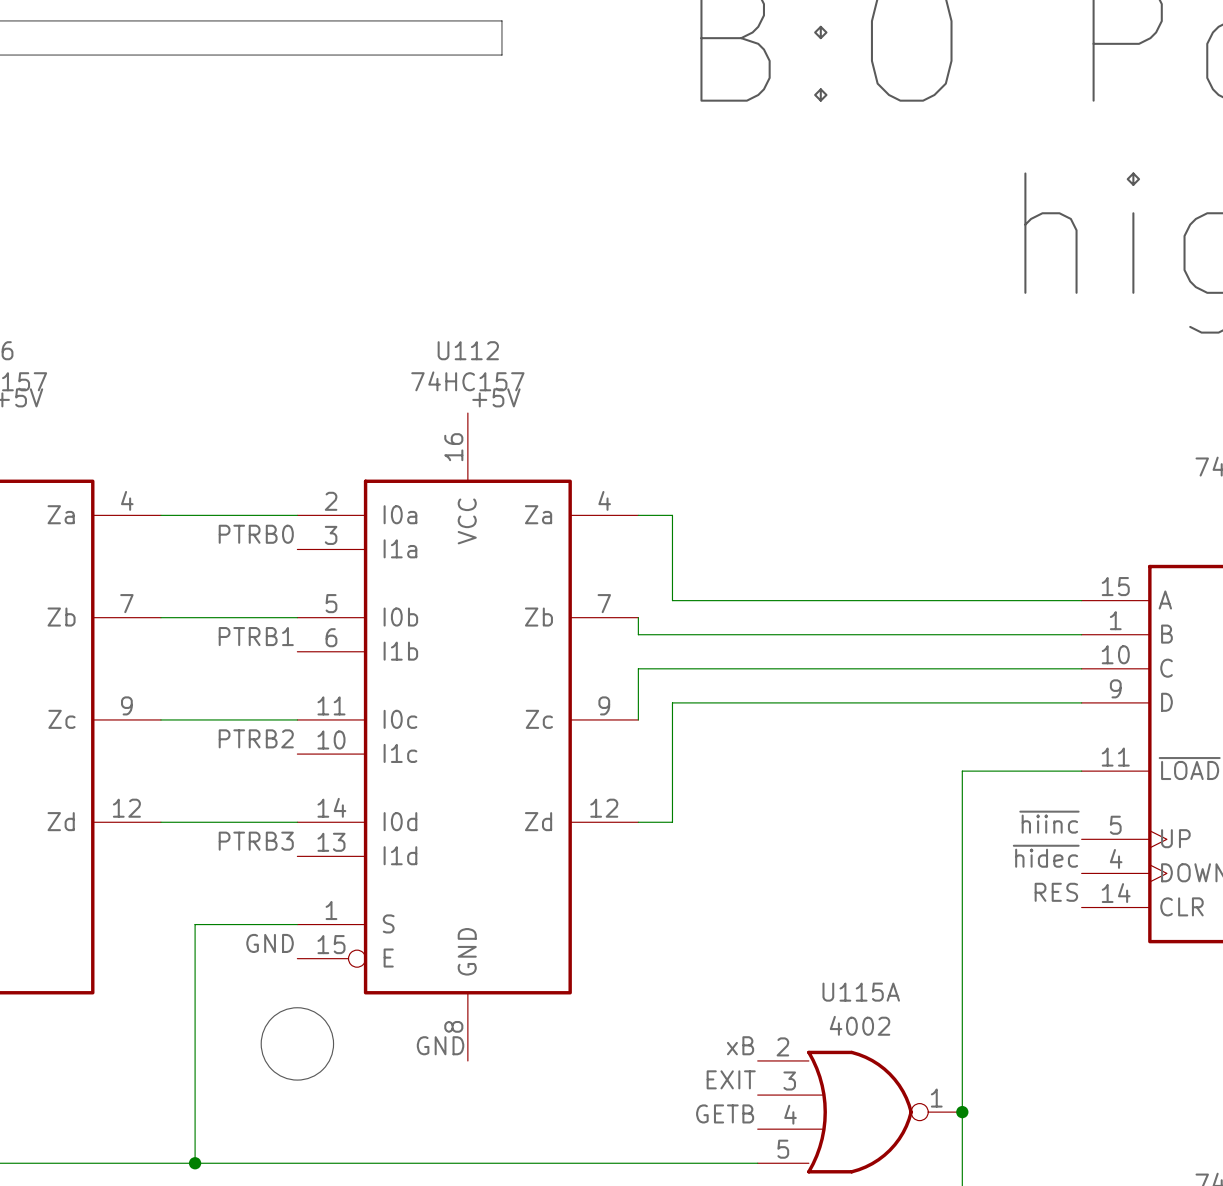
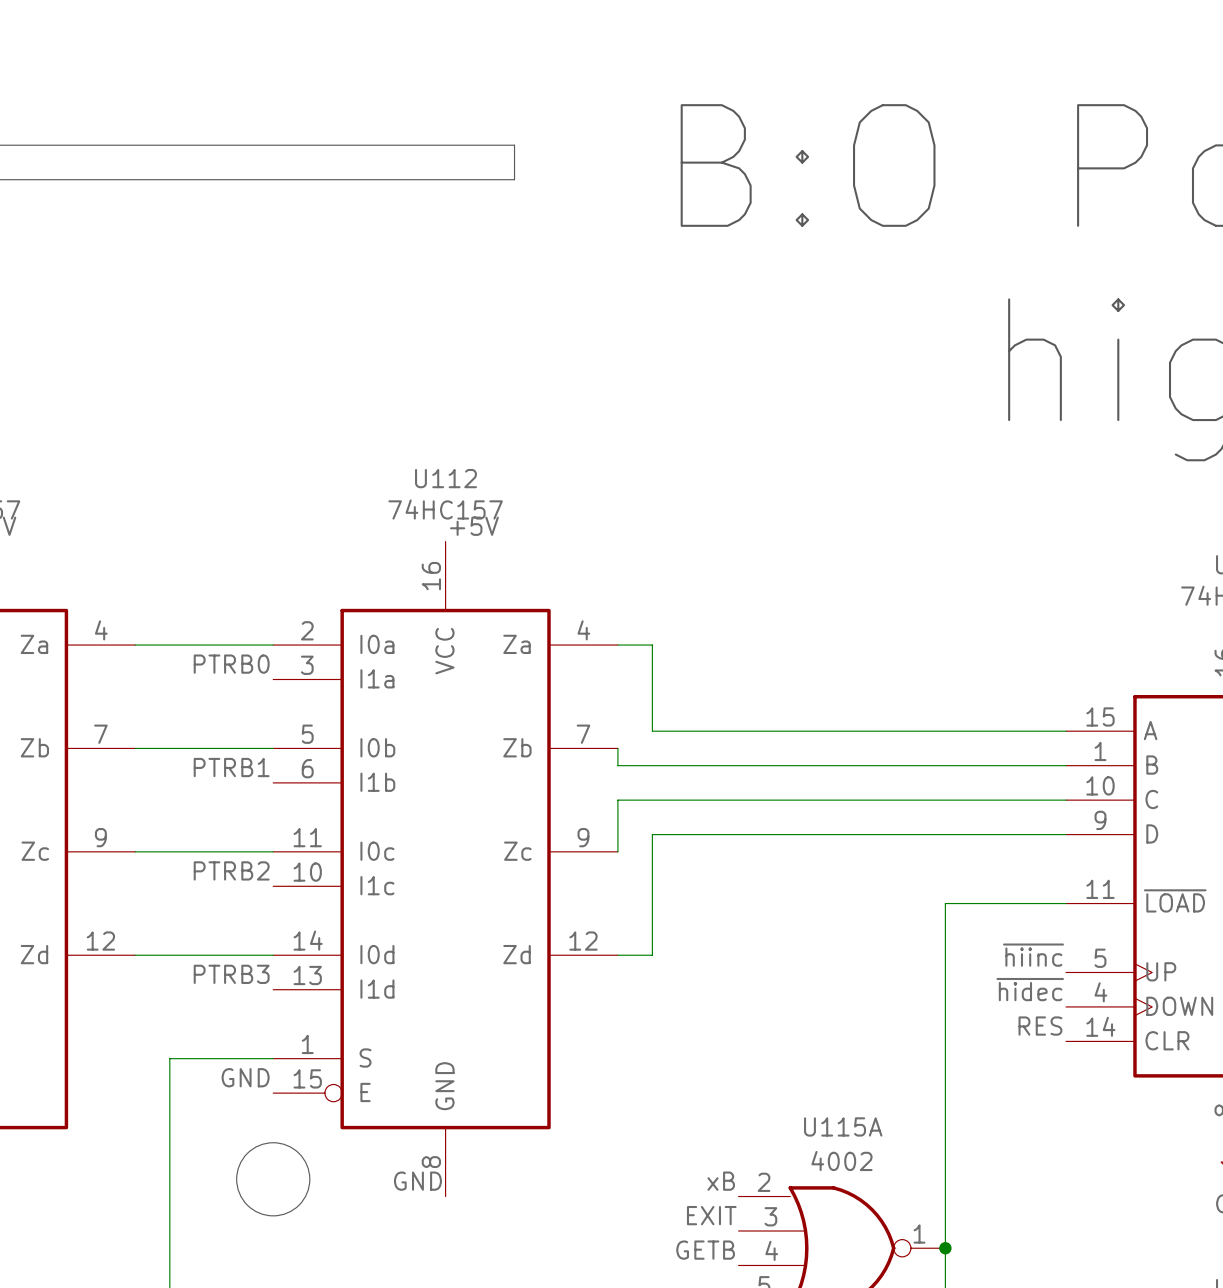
line: (501, 20) (501, 55) -> (480, 145) (514, 145) (514, 179) (480, 179)

